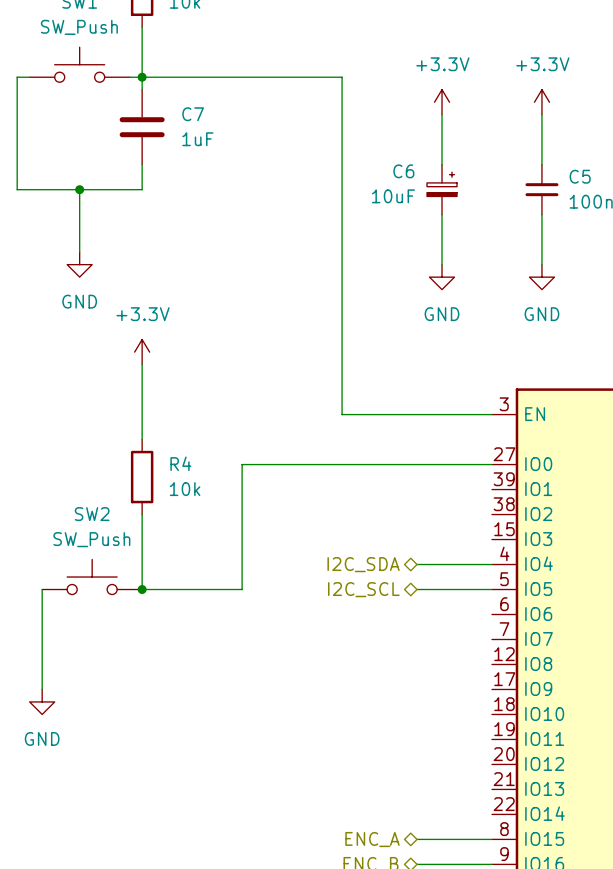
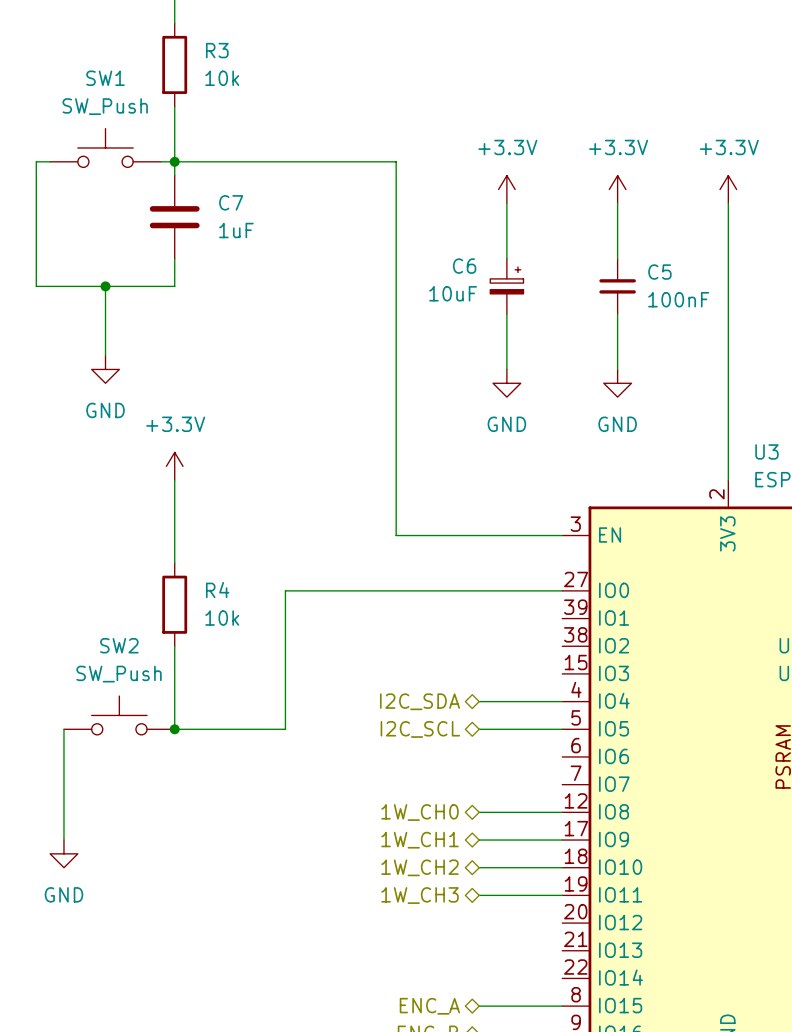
hierarchical label: none -> 1W_CH0 (420, 812)
wire: none -> (479, 812) (562, 812)
hierarchical label: none -> 1W_CH1 (420, 840)
wire: none -> (479, 840) (562, 840)
hierarchical label: none -> 1W_CH2 (420, 867)
wire: none -> (479, 867) (562, 867)
hierarchical label: none -> 1W_CH3 (420, 895)
wire: none -> (479, 895) (562, 895)

